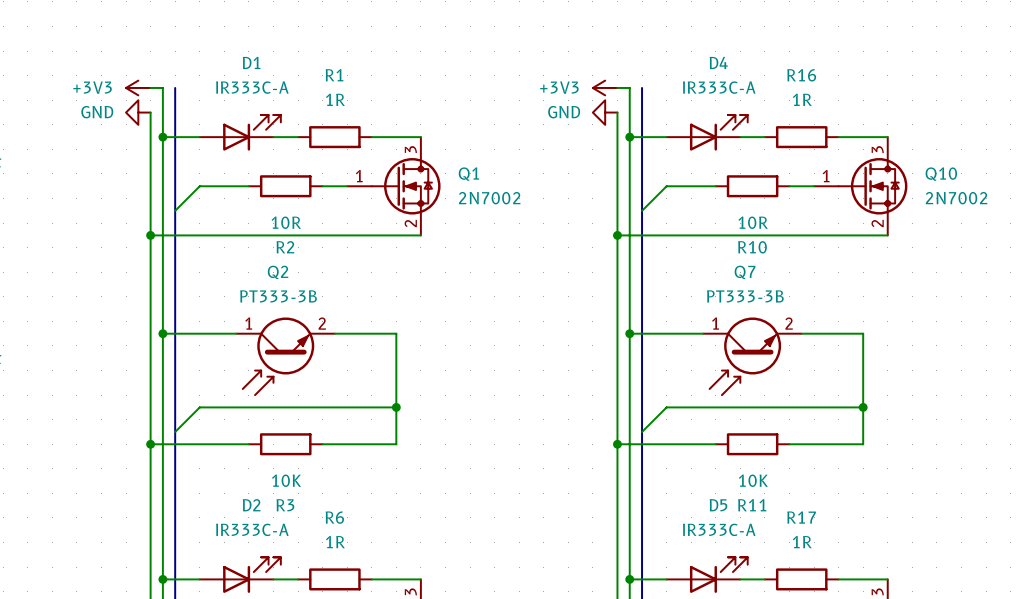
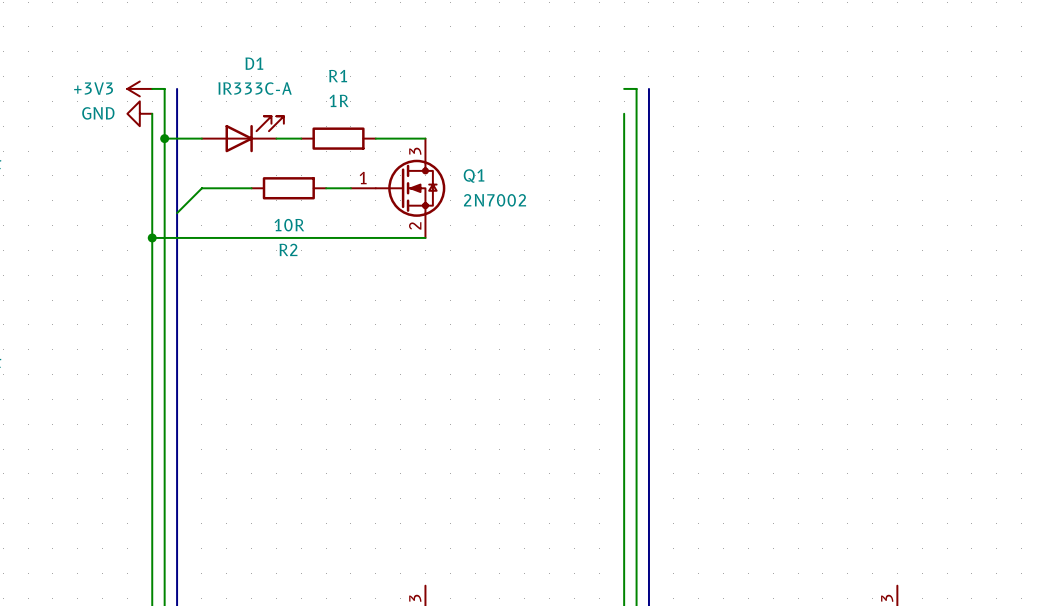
power symbol: +3V3 (605, 87) -> none
power symbol: GND (605, 112) -> none
D4: IR333C-A (707, 132) -> none
wire: (629, 137) (666, 137) -> none
junction: (629, 137) -> none
wire: (740, 137) (764, 137) -> none
R16: 1R (801, 137) -> none
wire: (838, 137) (887, 137) -> none
wire: (715, 186) (666, 186) (642, 210) -> none
R10: 10R (752, 186) -> none
wire: (789, 186) (814, 186) -> none
Q10: 2N7002 (860, 186) -> none
wire: (617, 235) (887, 235) -> none
junction: (617, 235) -> none
wire: (162, 333) (236, 333) -> none
junction: (162, 333) -> none
wire: (334, 333) (396, 333) (396, 444) (322, 444) -> none
wire: (629, 333) (703, 333) -> none
junction: (629, 333) -> none
wire: (801, 333) (863, 333) (863, 444) (789, 444) -> none
Q2: PT333-3B (285, 356) -> none
Q7: PT333-3B (752, 356) -> none
wire: (396, 407) (199, 407) (175, 431) -> none
junction: (396, 407) -> none
wire: (863, 407) (666, 407) (642, 431) -> none
junction: (863, 407) -> none
wire: (150, 444) (248, 444) -> none
junction: (150, 444) -> none
R3: 10K (285, 444) -> none
wire: (617, 444) (715, 444) -> none
junction: (617, 444) -> none
R11: 10K (752, 444) -> none
D2: IR333C-A (240, 575) -> none
D5: IR333C-A (707, 575) -> none
wire: (162, 579) (199, 579) -> none
junction: (162, 579) -> none
wire: (273, 579) (298, 579) -> none
R6: 1R (334, 579) -> none
wire: (371, 579) (420, 579) -> none
wire: (629, 579) (666, 579) -> none
junction: (629, 579) -> none
wire: (740, 579) (764, 579) -> none
R17: 1R (801, 579) -> none
wire: (838, 579) (887, 579) -> none

